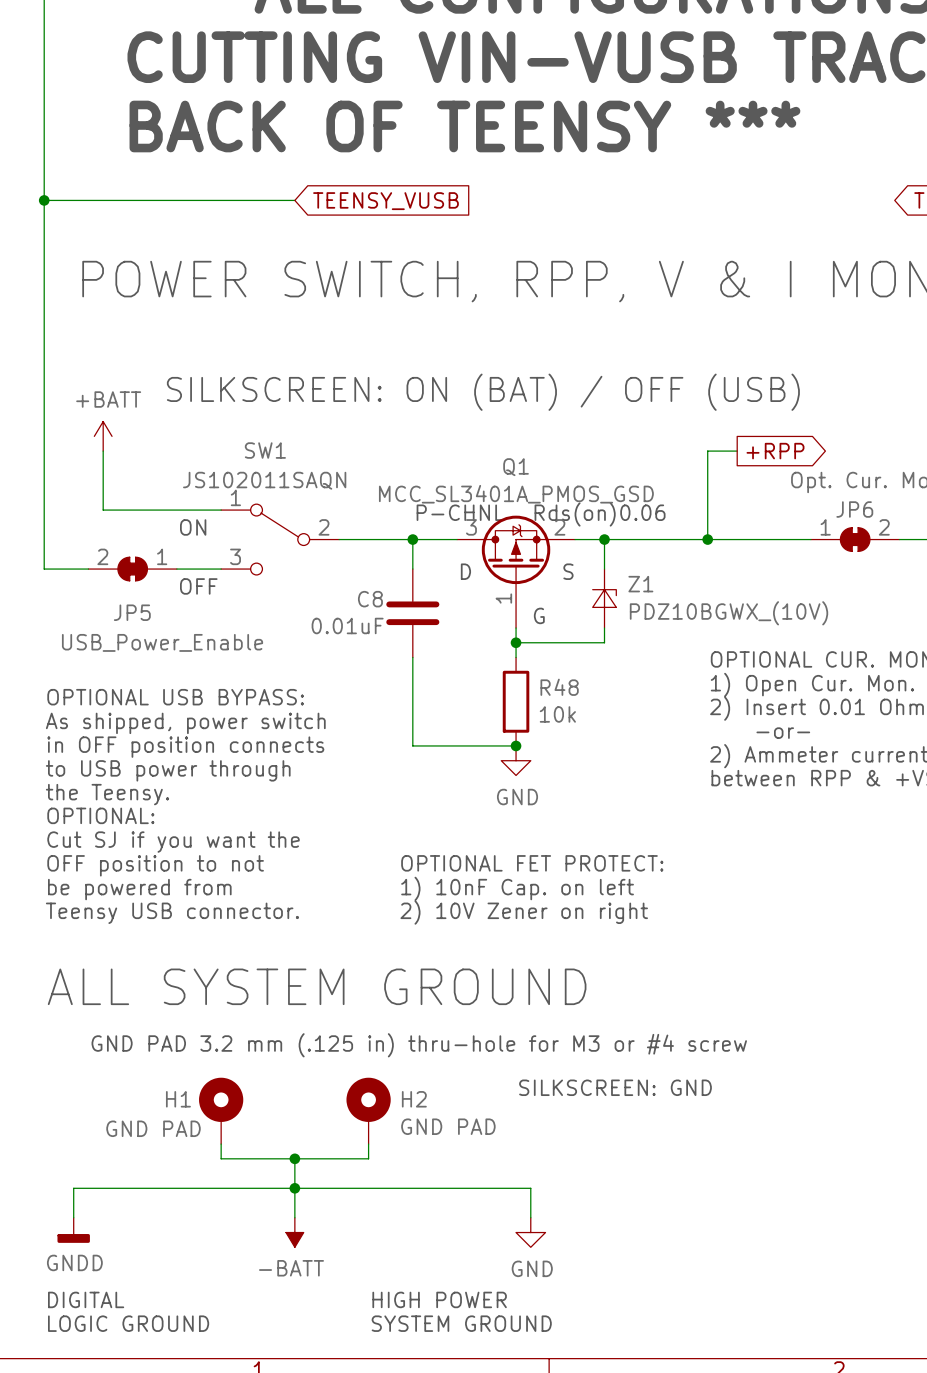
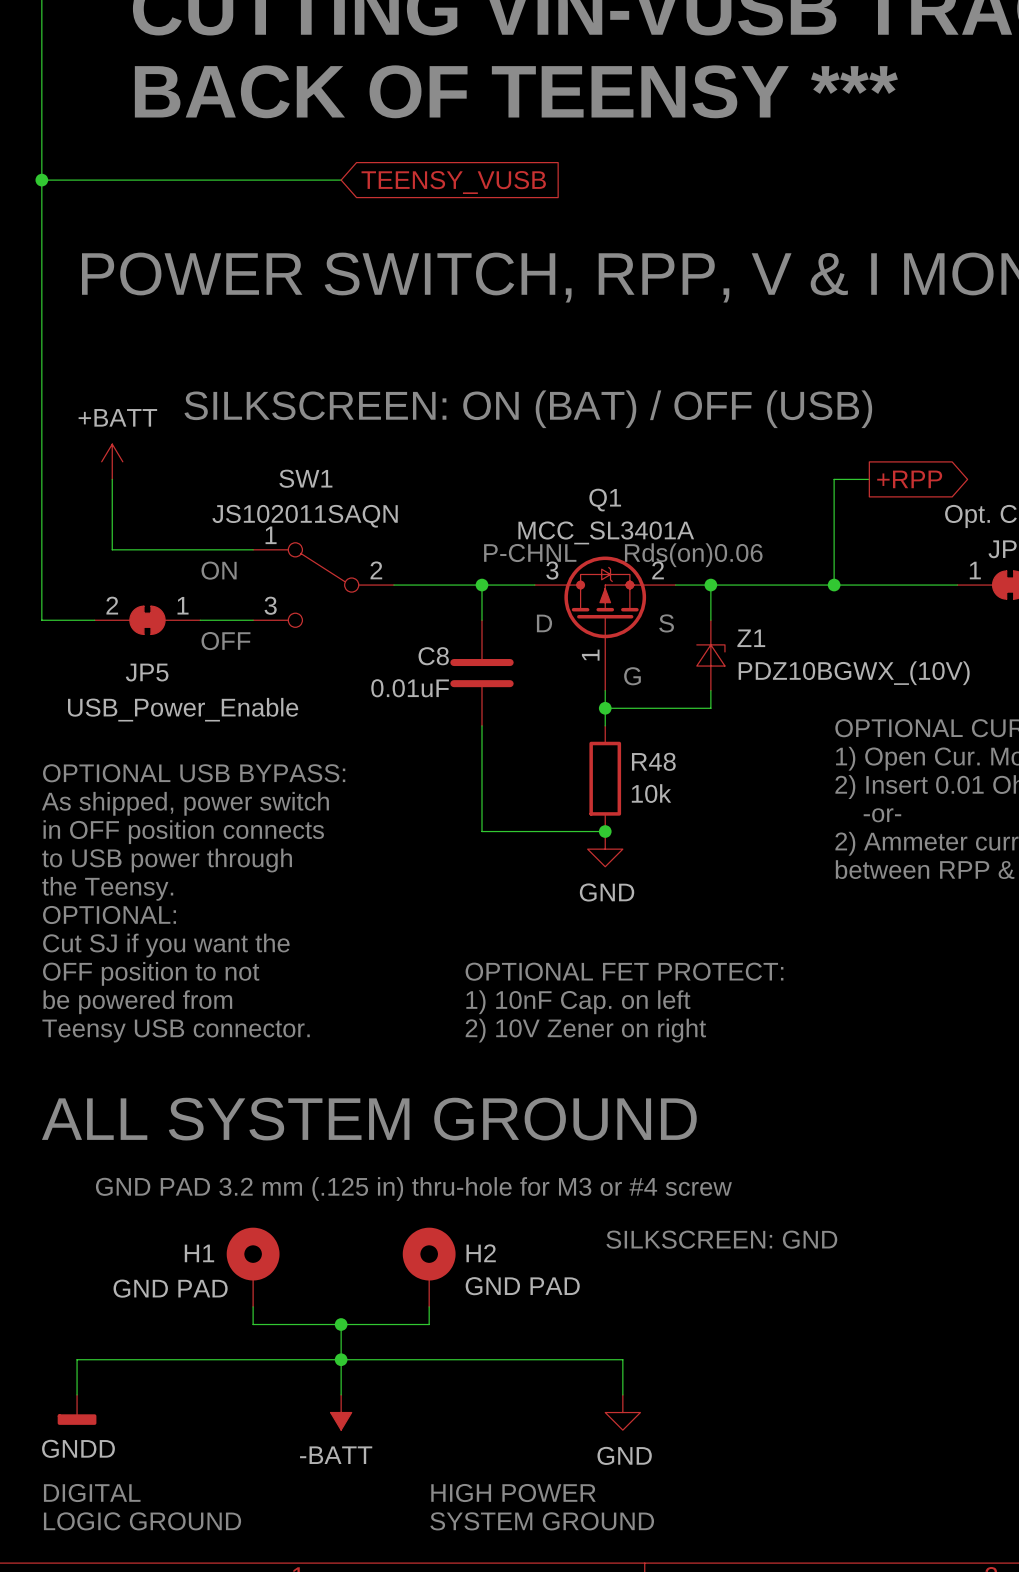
Q1 value: MCC_SL3401A_PMOS_GSD (516, 494) -> MCC_SL3401A (606, 532)

